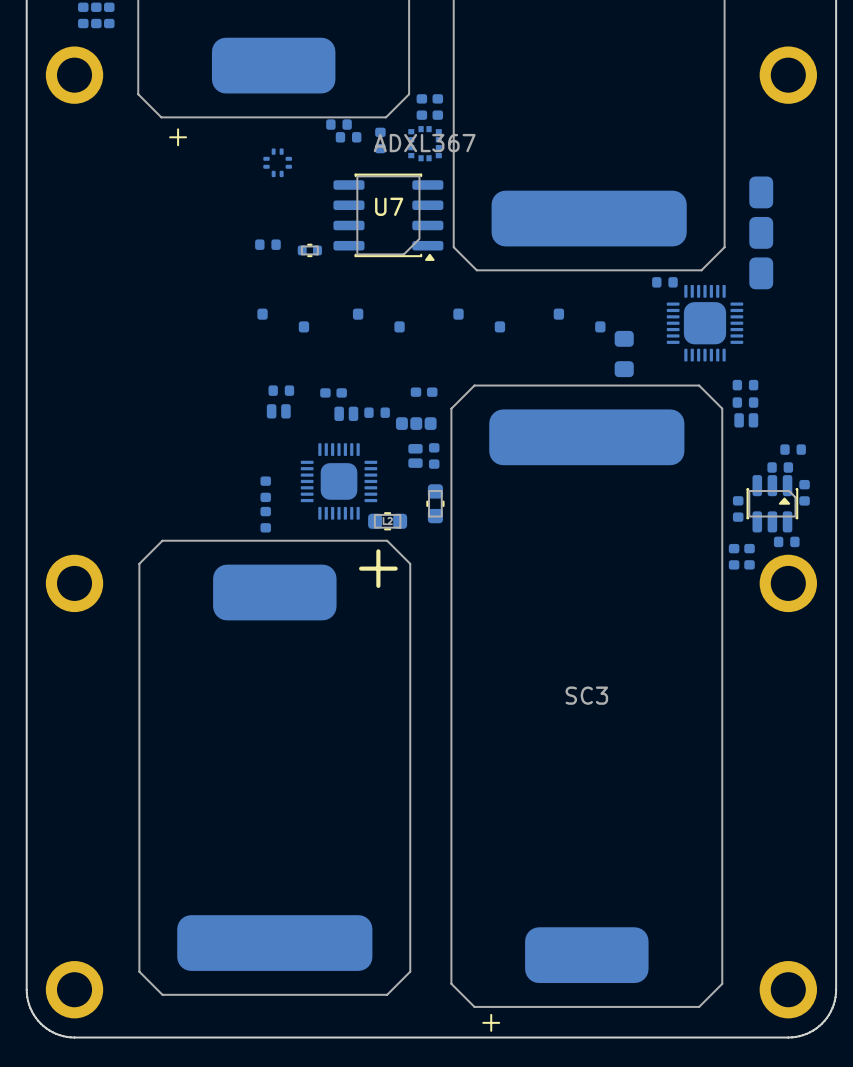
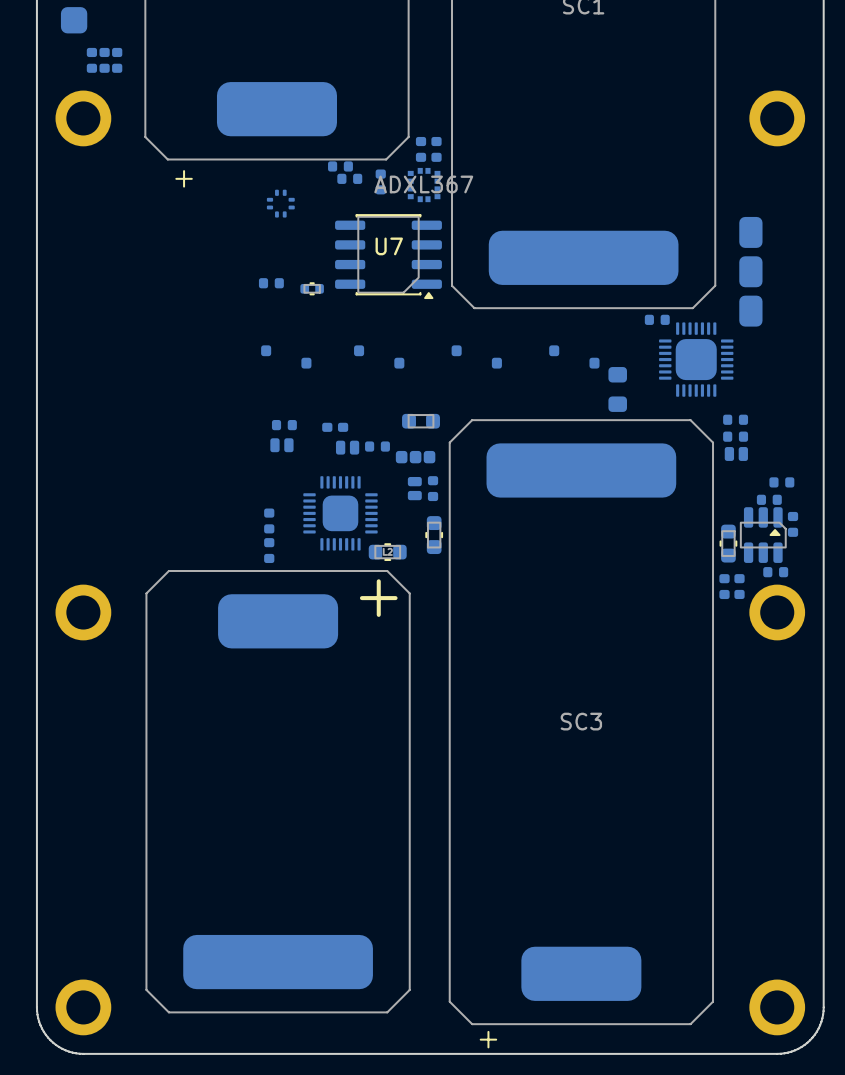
part footprint: [410, 387, 438, 397] -> [402, 413, 440, 429]
part footprint: [746, 475, 799, 533] -> [740, 507, 787, 563]
part footprint: [732, 496, 744, 522] -> [719, 524, 738, 563]

